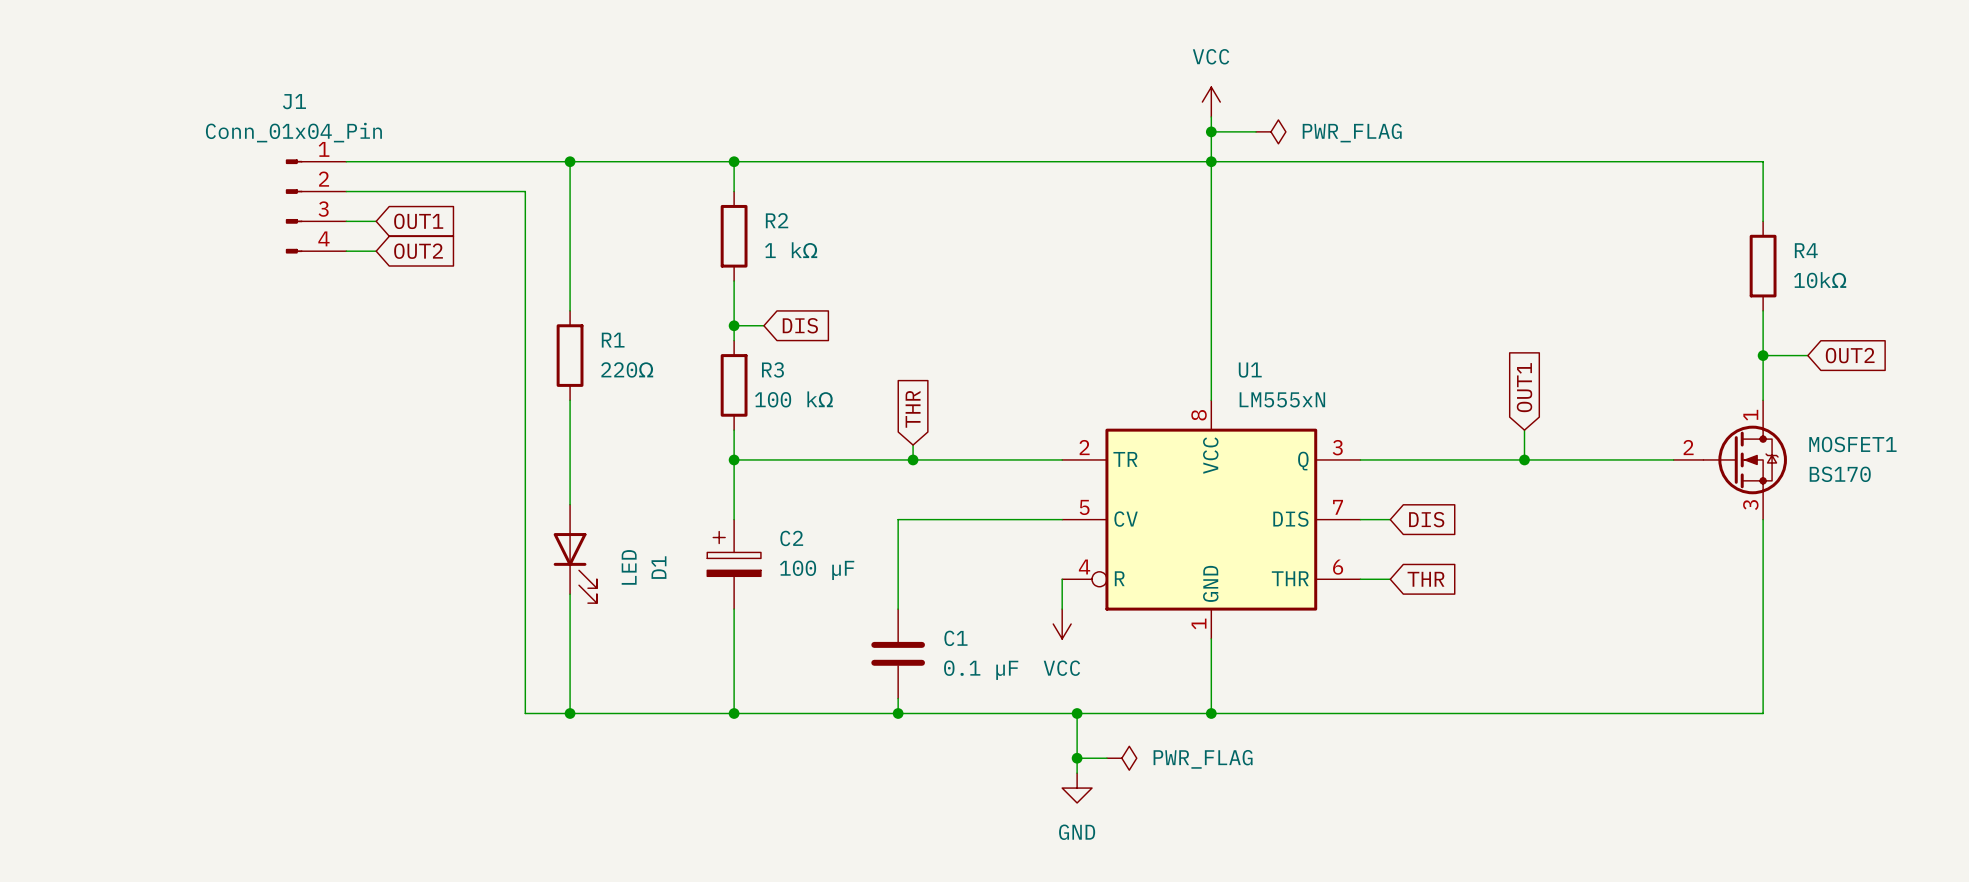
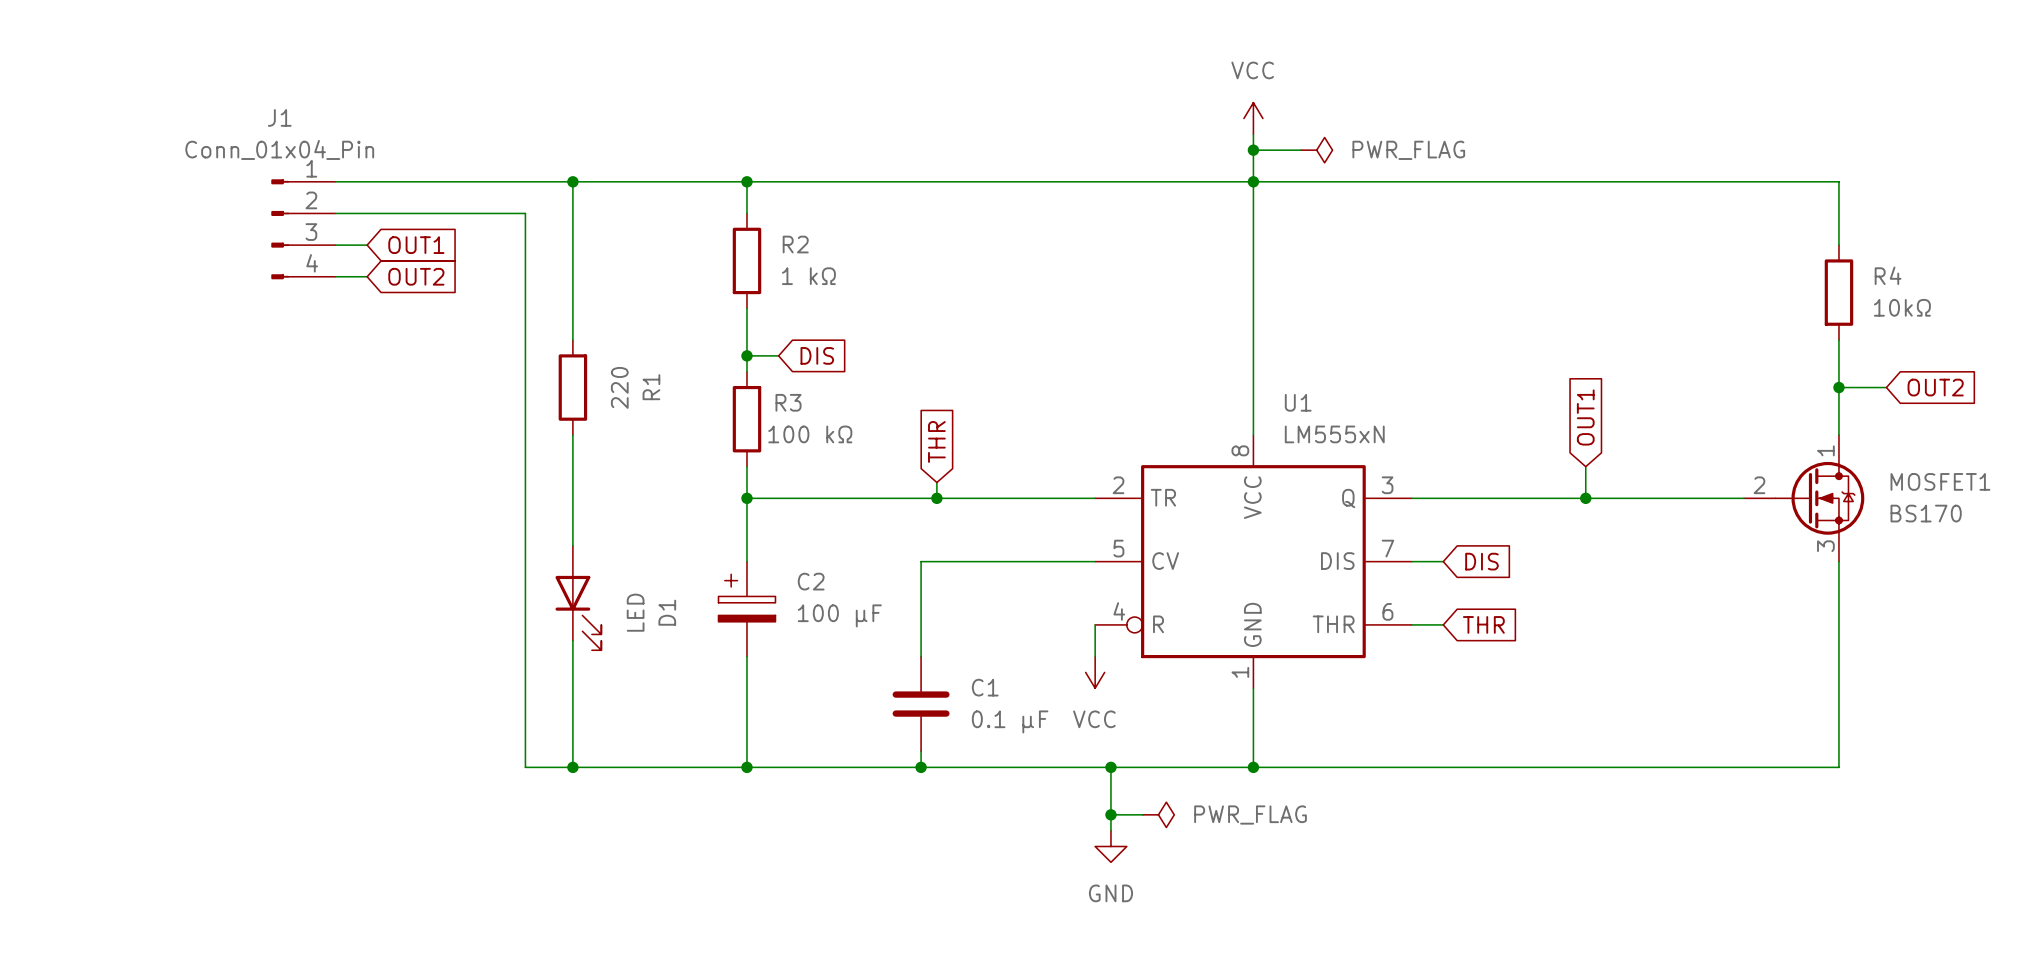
R1 name rotation: 0° (613, 340) -> 90° counterclockwise (651, 387)
R1 value: 220Ω (627, 369) -> 220 (619, 387)

